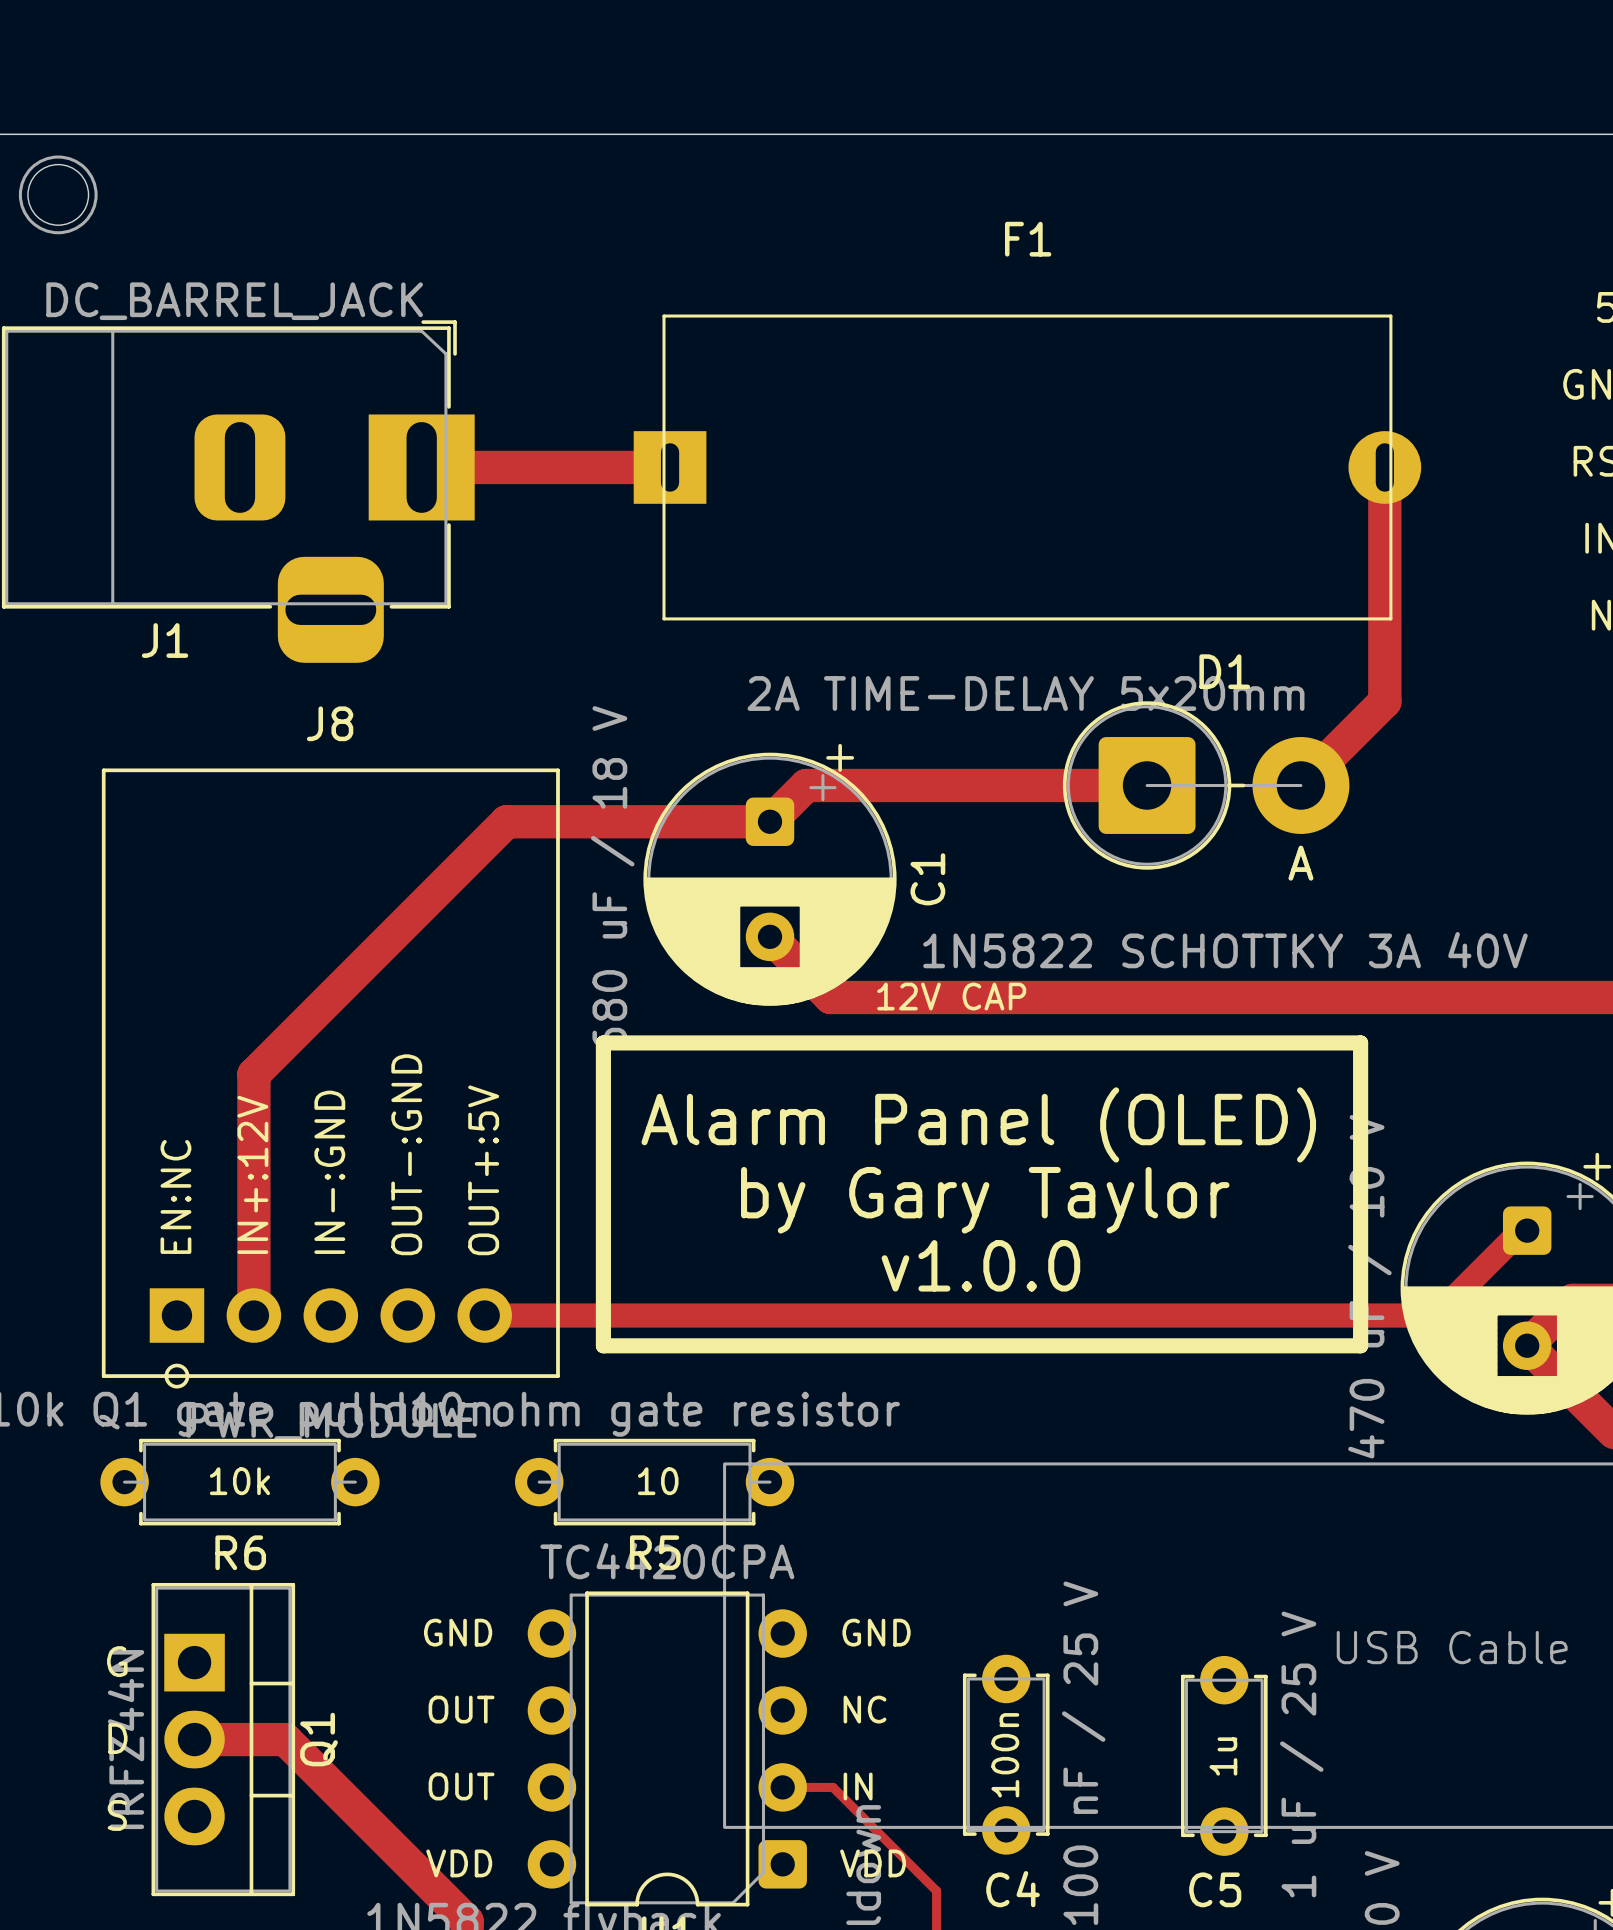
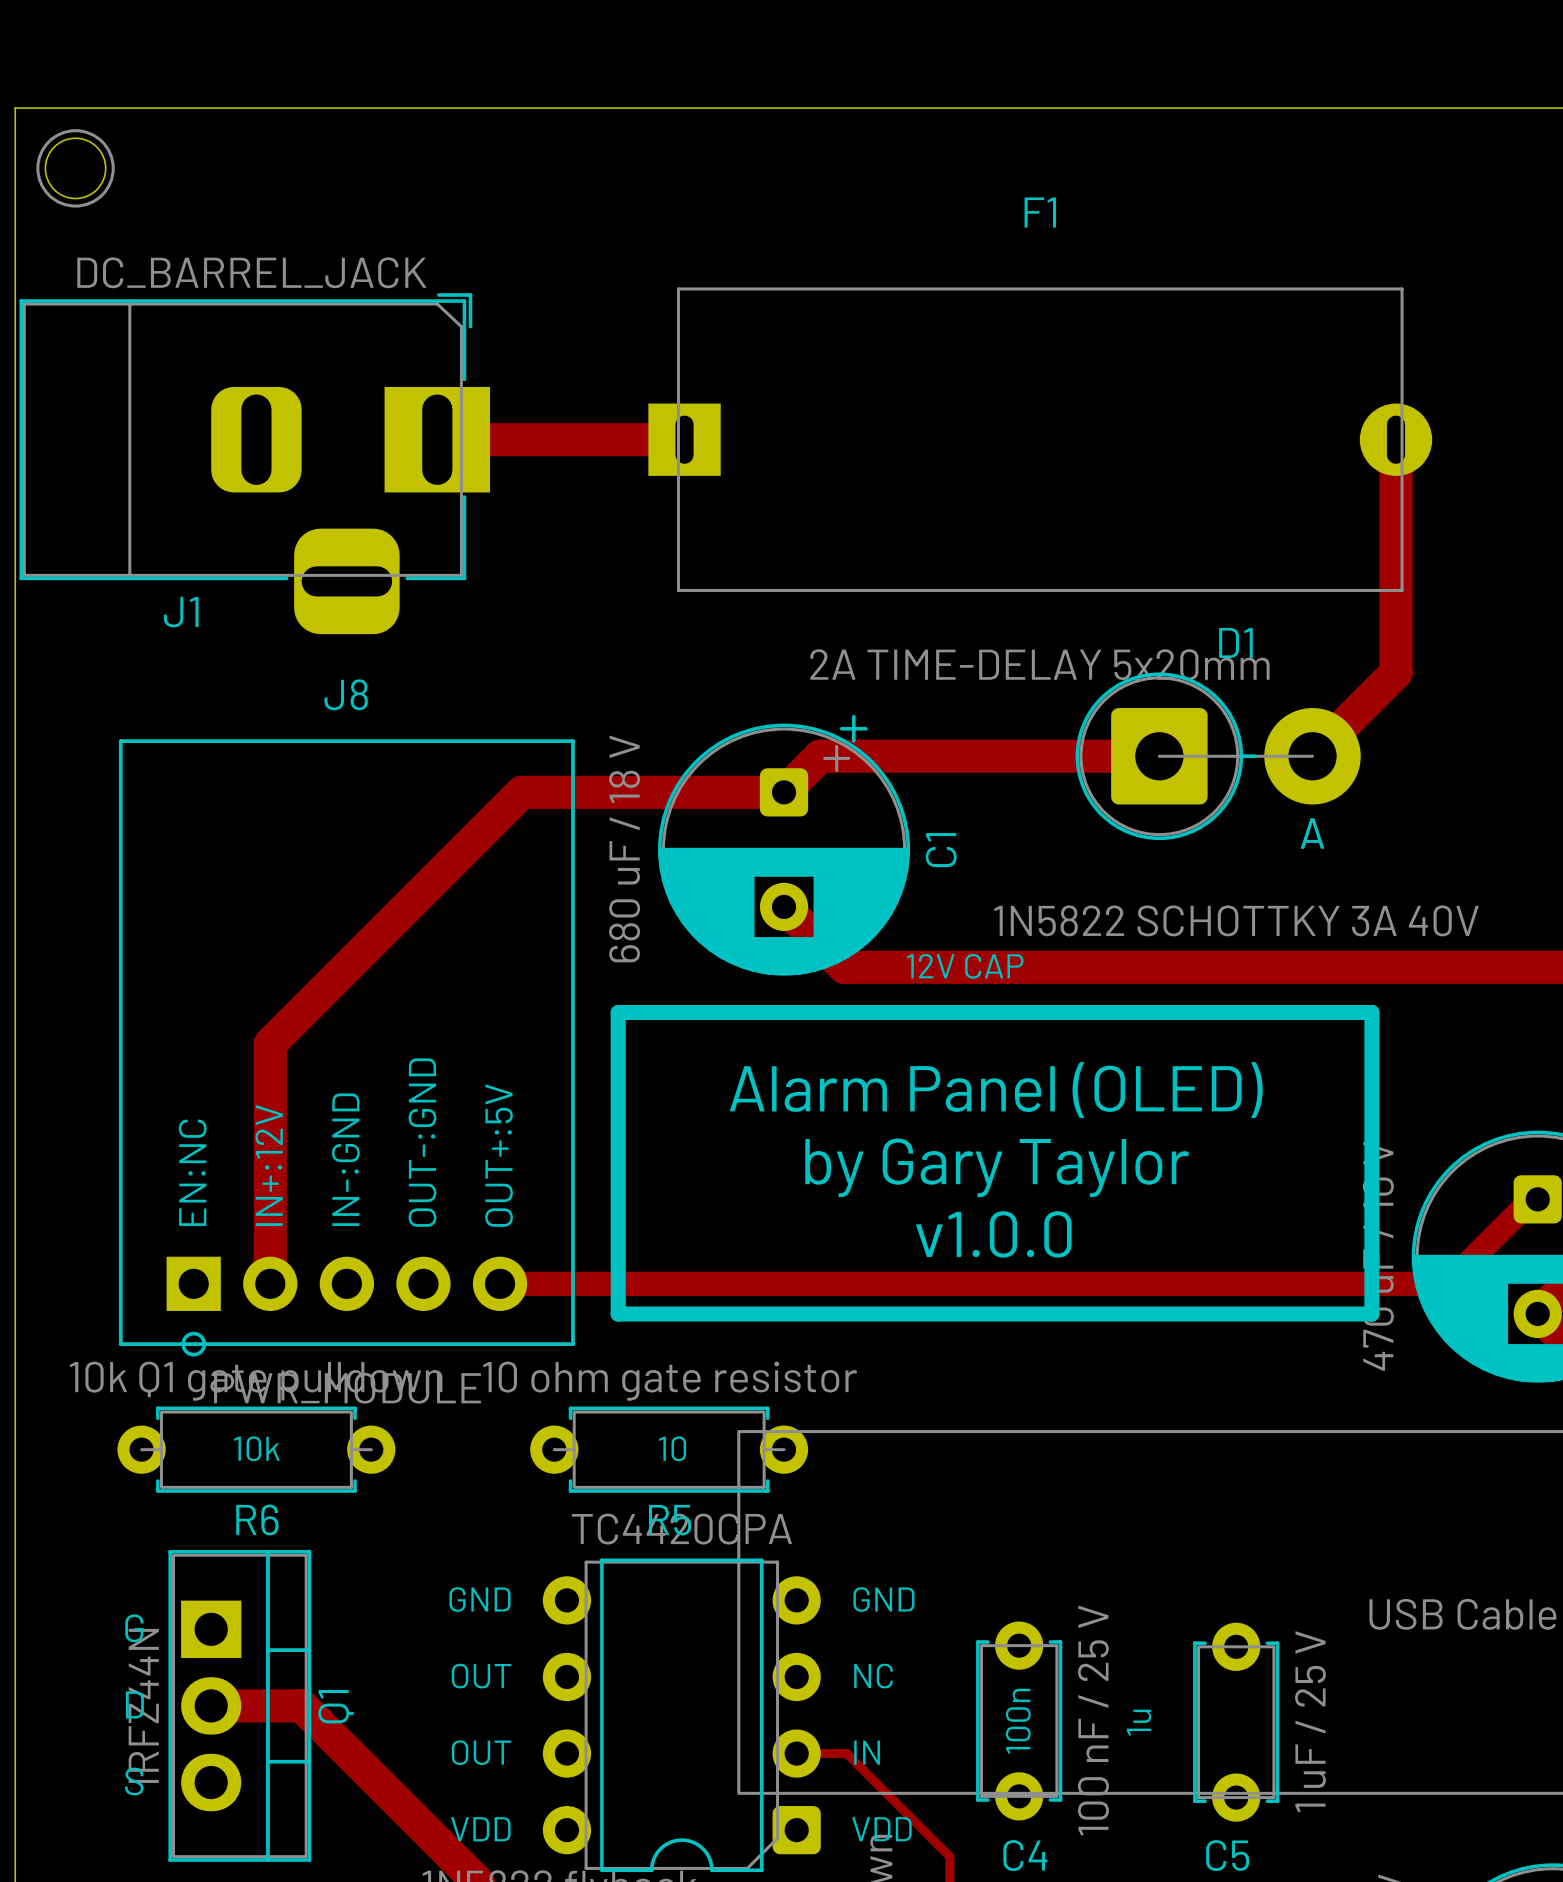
F1 footprint: [633, 314, 1422, 621] -> [648, 287, 1433, 592]
text position: 1u (1223, 1756) -> 1u (1138, 1722)

